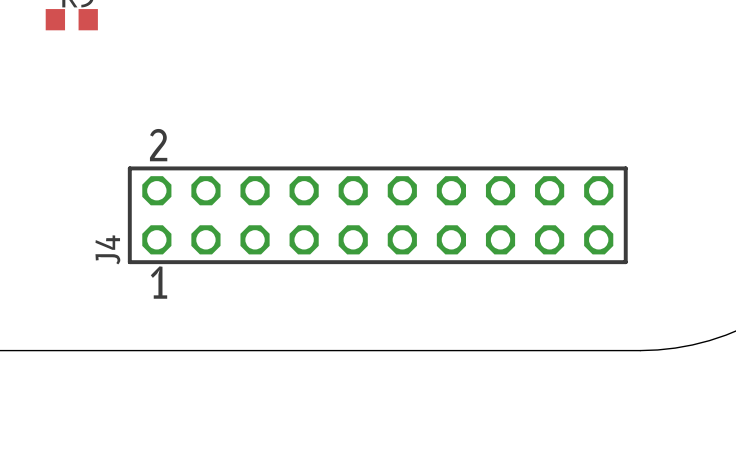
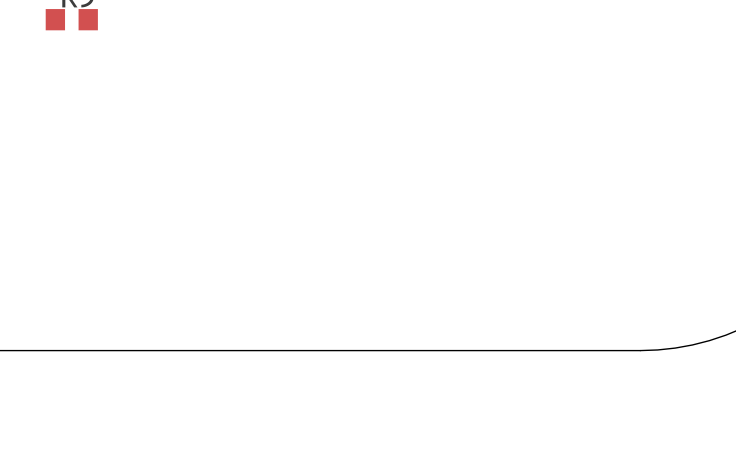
J4: (377, 215) -> none

